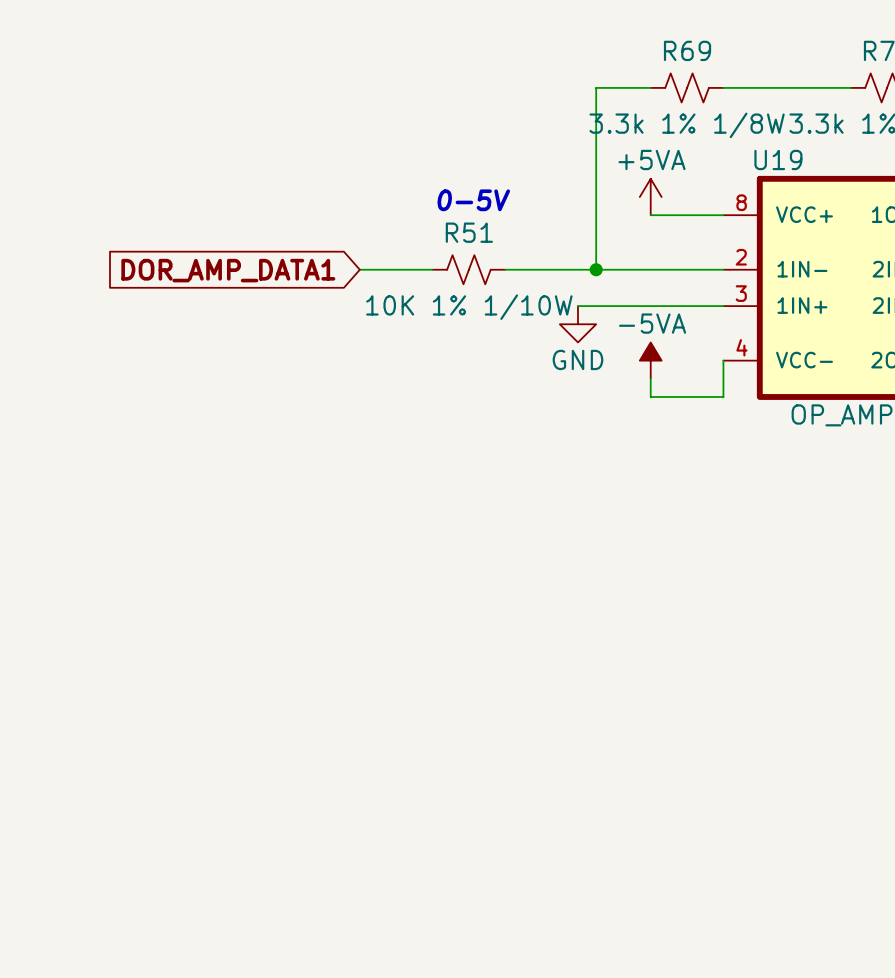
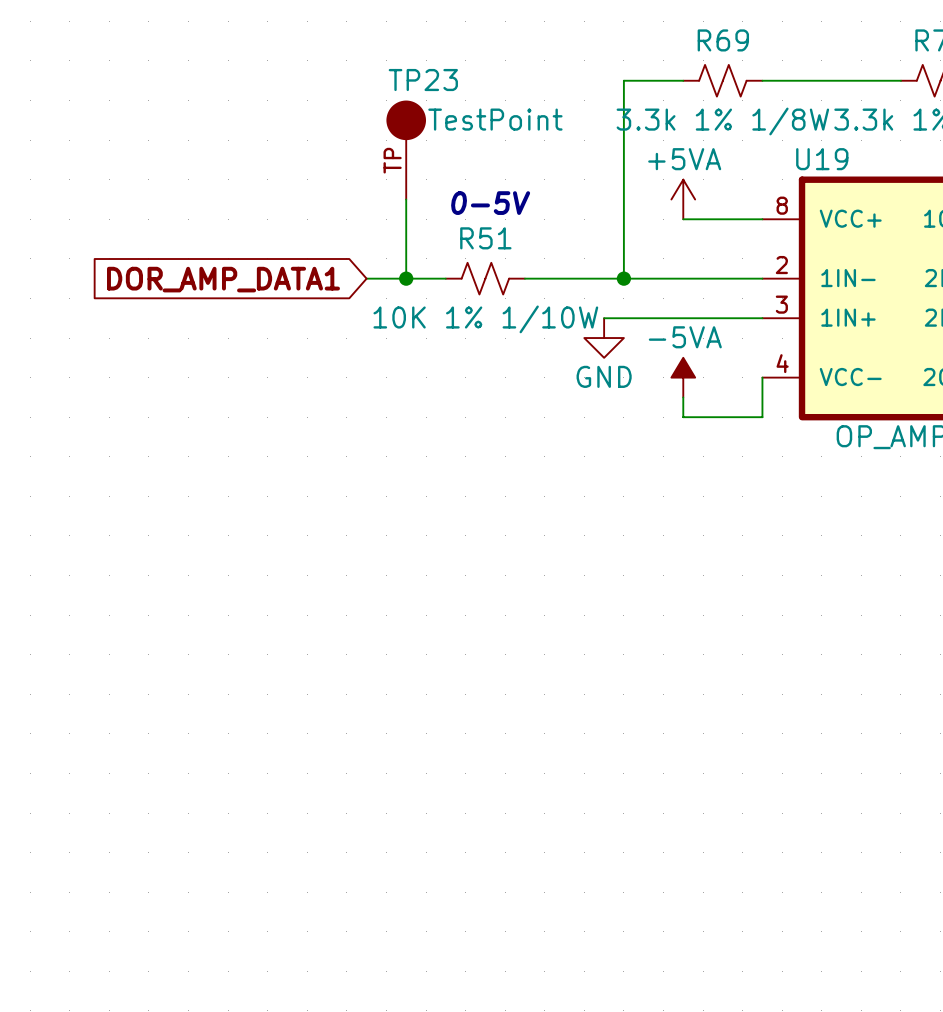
TP23: none -> TestPoint (406, 150)
wire: none -> (406, 199) (406, 278)
junction: none -> (406, 278)

